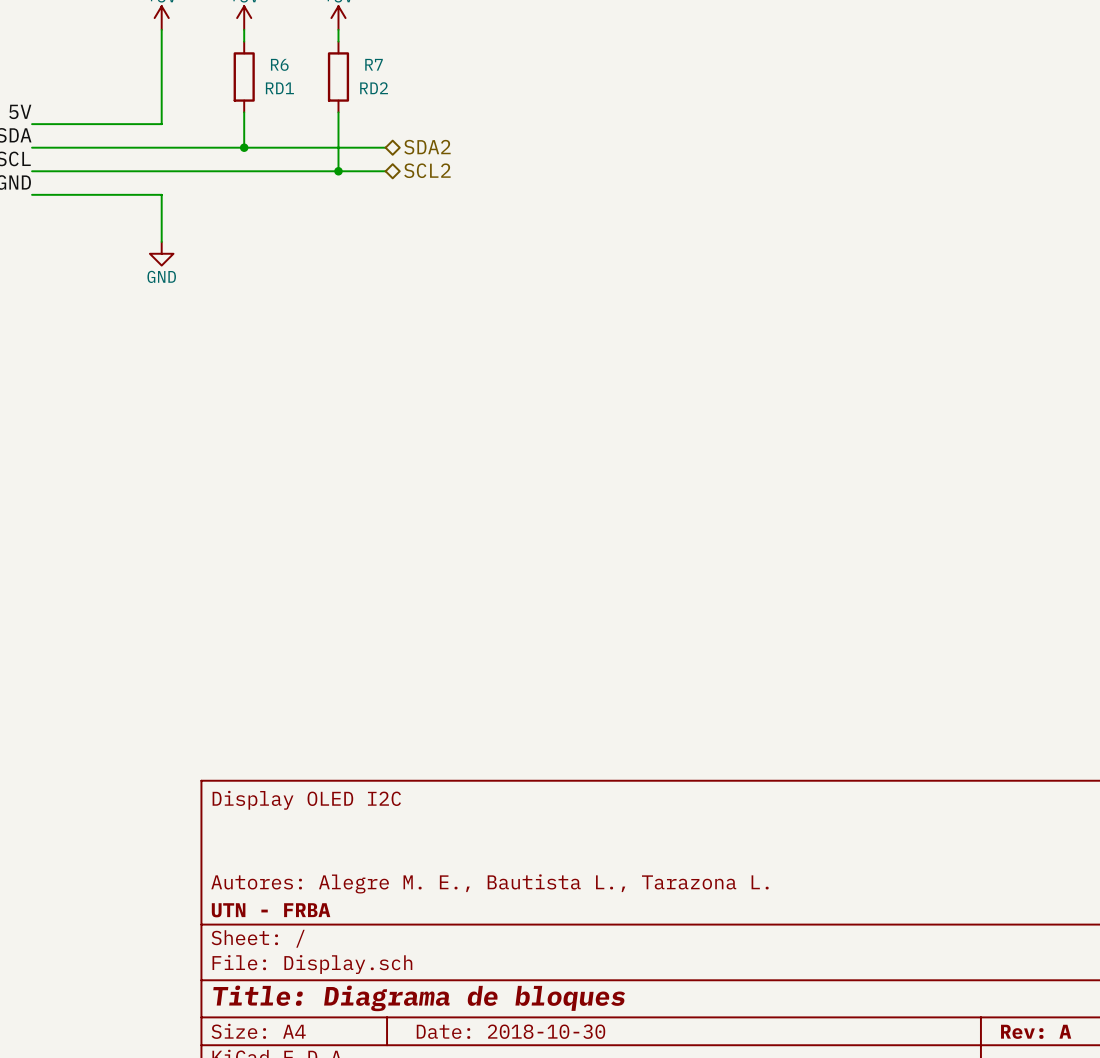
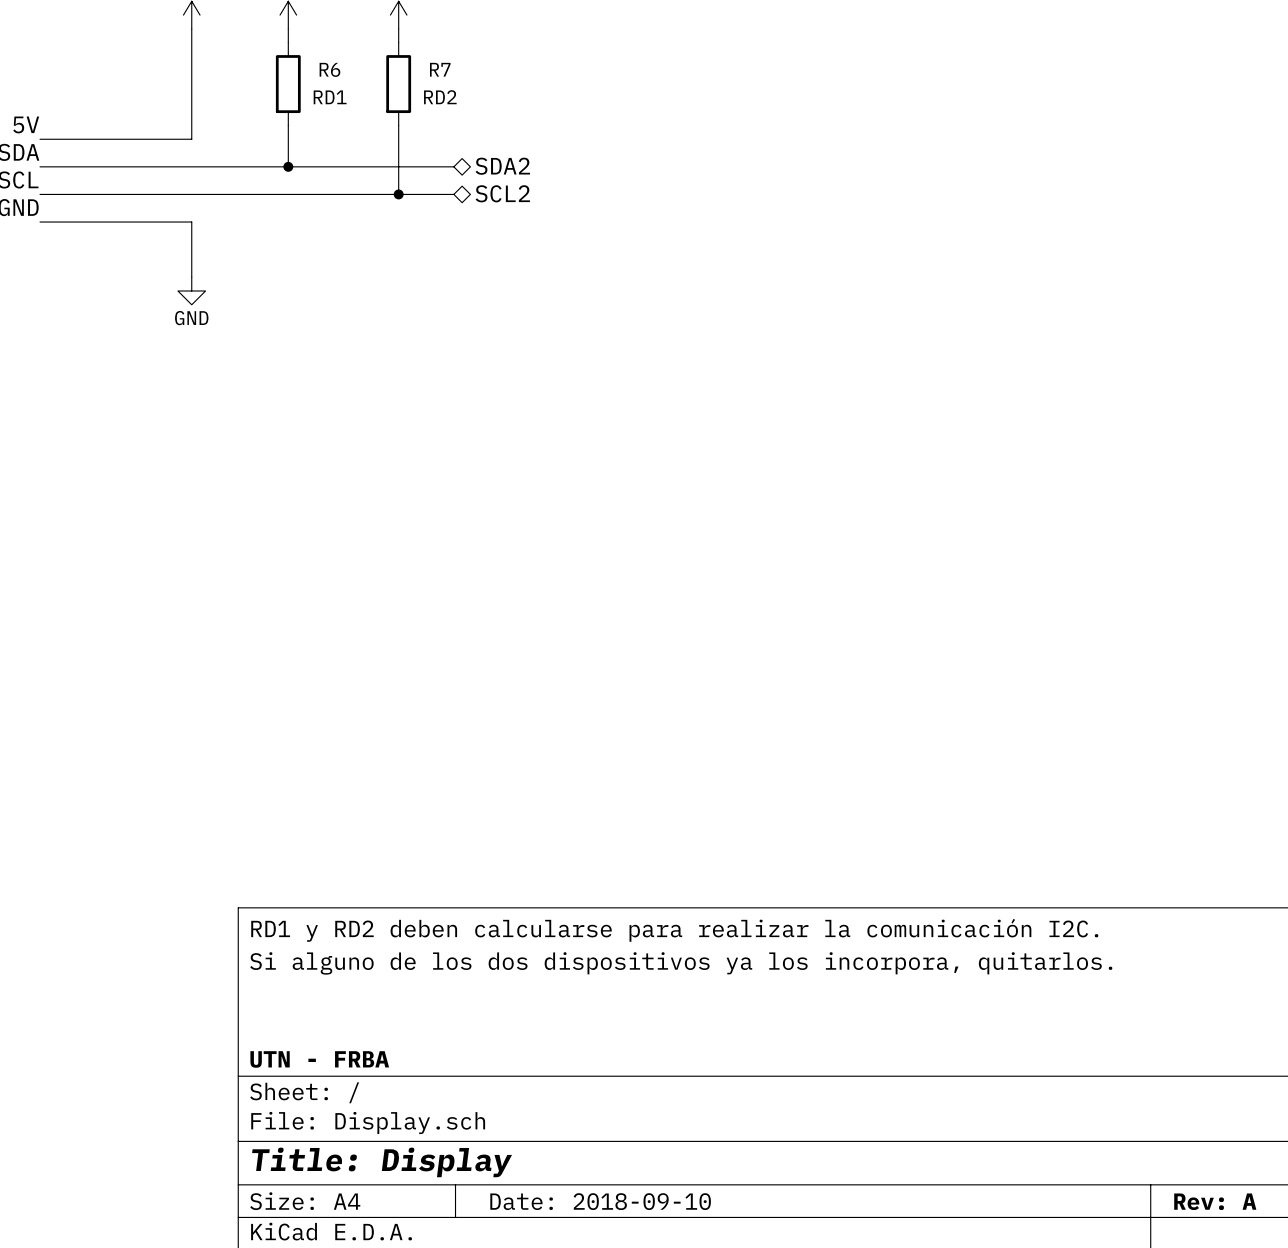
title block: Display OLED I2C (306, 800) -> RD1 y RD2 deben calcularse para realizar la comunicación I2C. (674, 930)
title block: none -> Si alguno de los dos dispositivos ya los incorpora, quitarlos. (681, 963)
title block: Autores: Alegre M. E., Bautista L., Tarazona L. (489, 883) -> none
title block: Title: Diagrama de bloques (419, 998) -> Title: Display (382, 1162)
title block: Date: 2018-10-30 (510, 1031) -> Date: 2018-09-10 (600, 1201)

